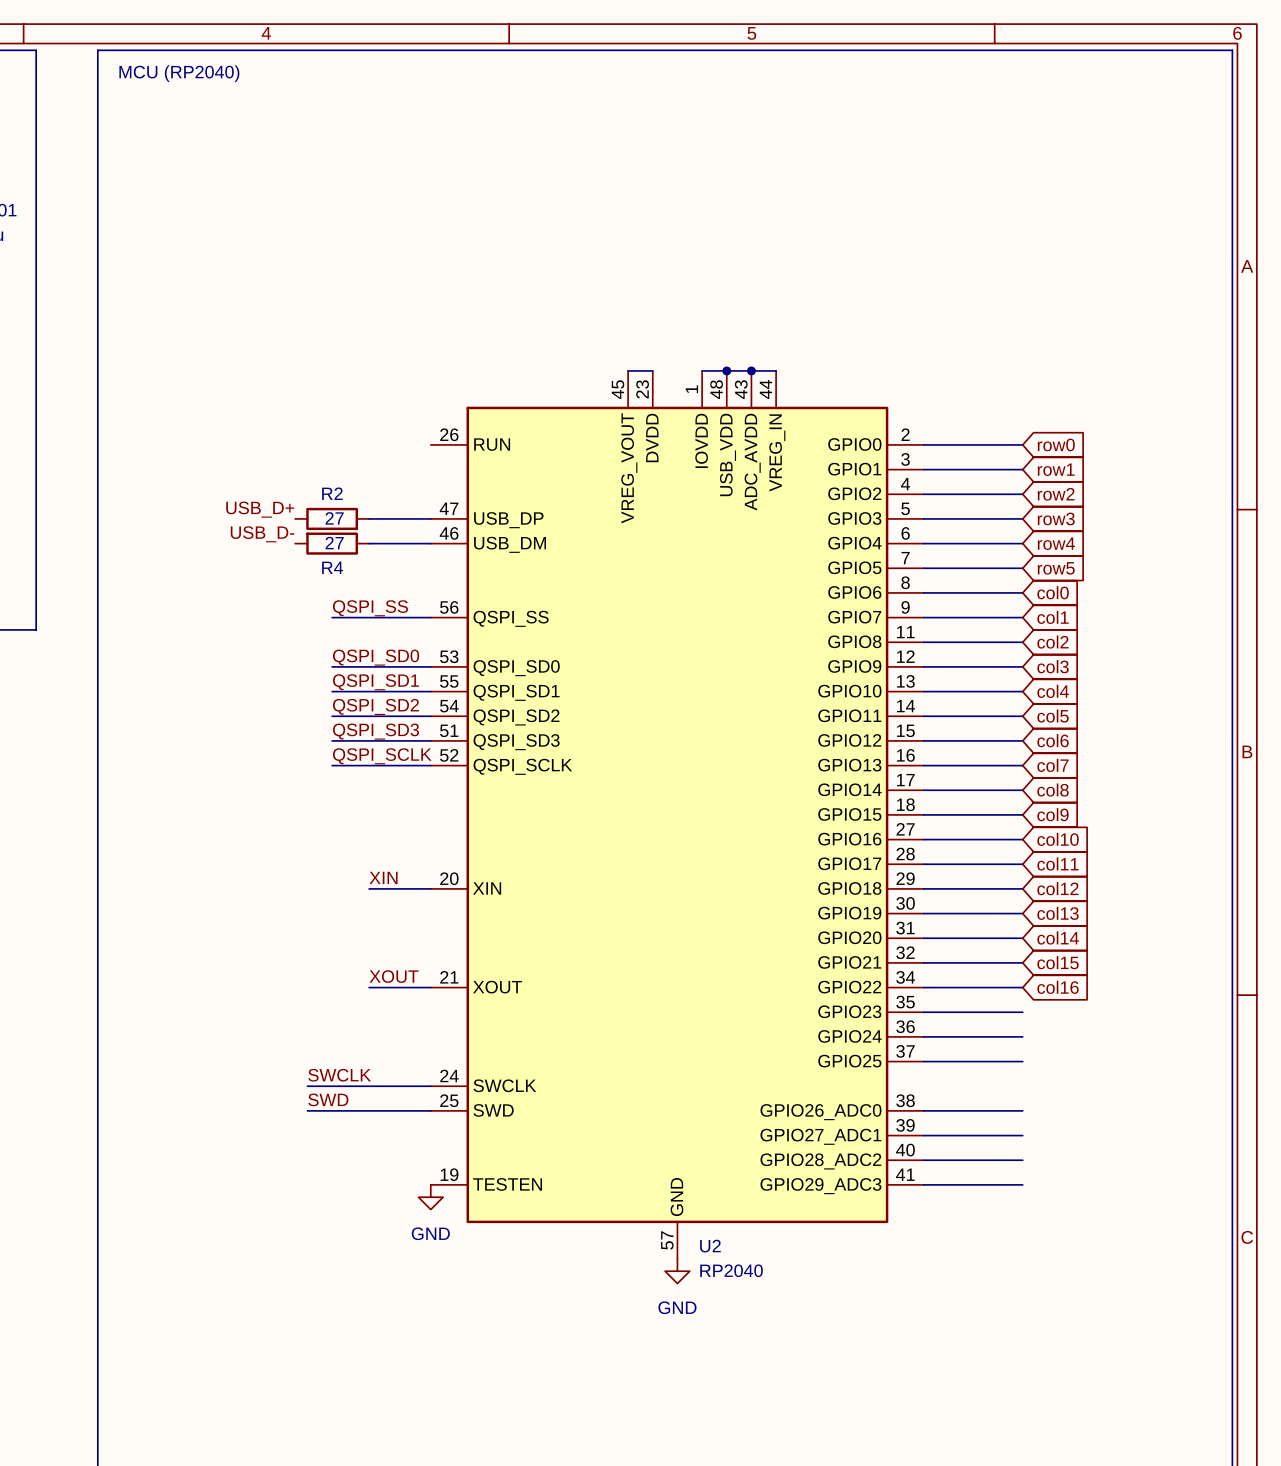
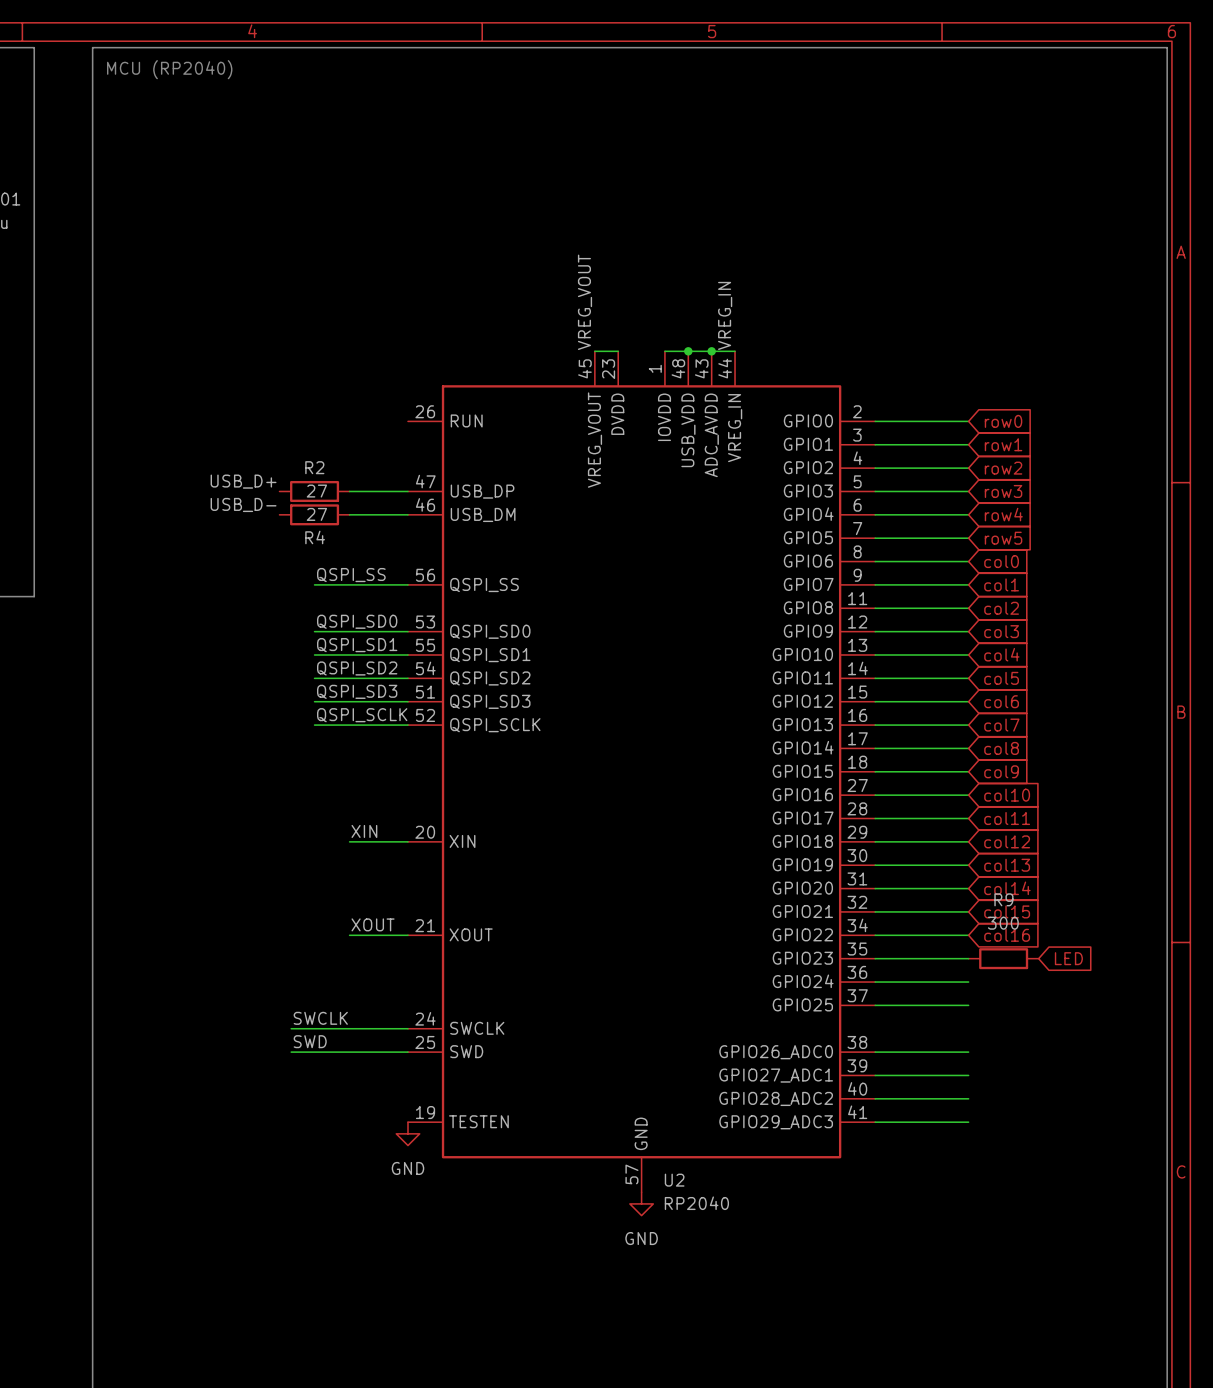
label: none -> VREG_VOUT (585, 302)
label: none -> VREG_IN (725, 315)
R9: none -> 300 (1003, 958)
global label: none -> LED (1068, 958)

